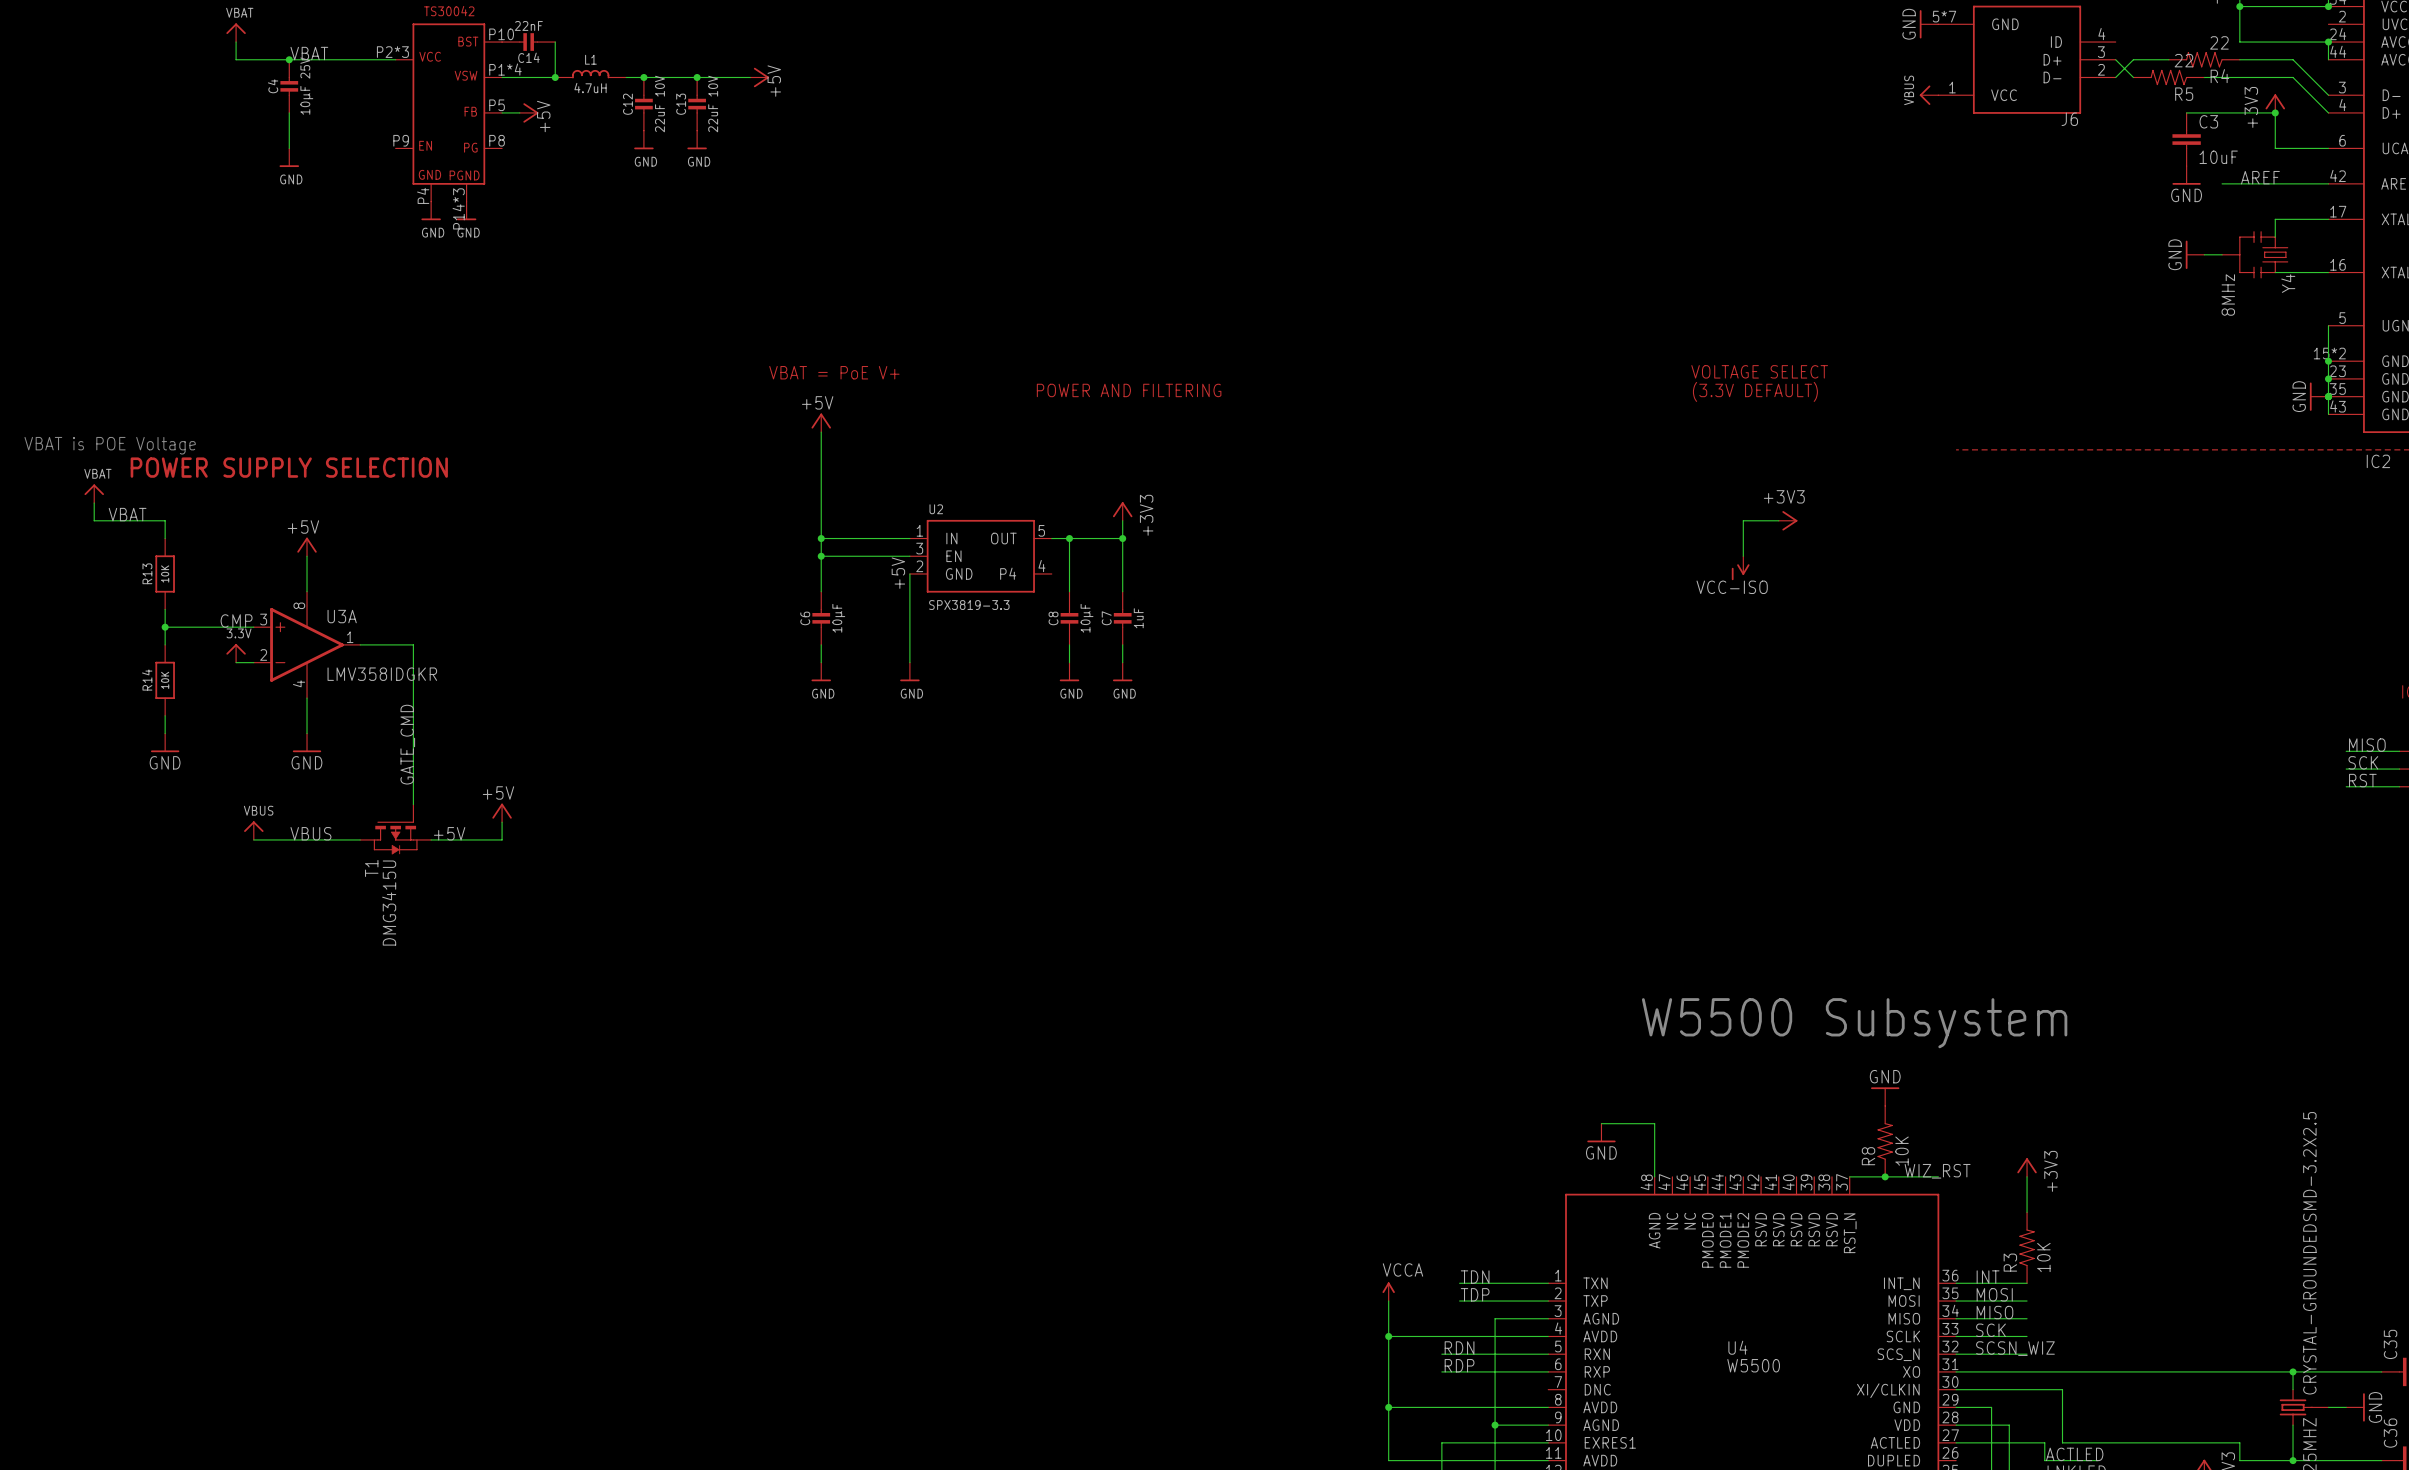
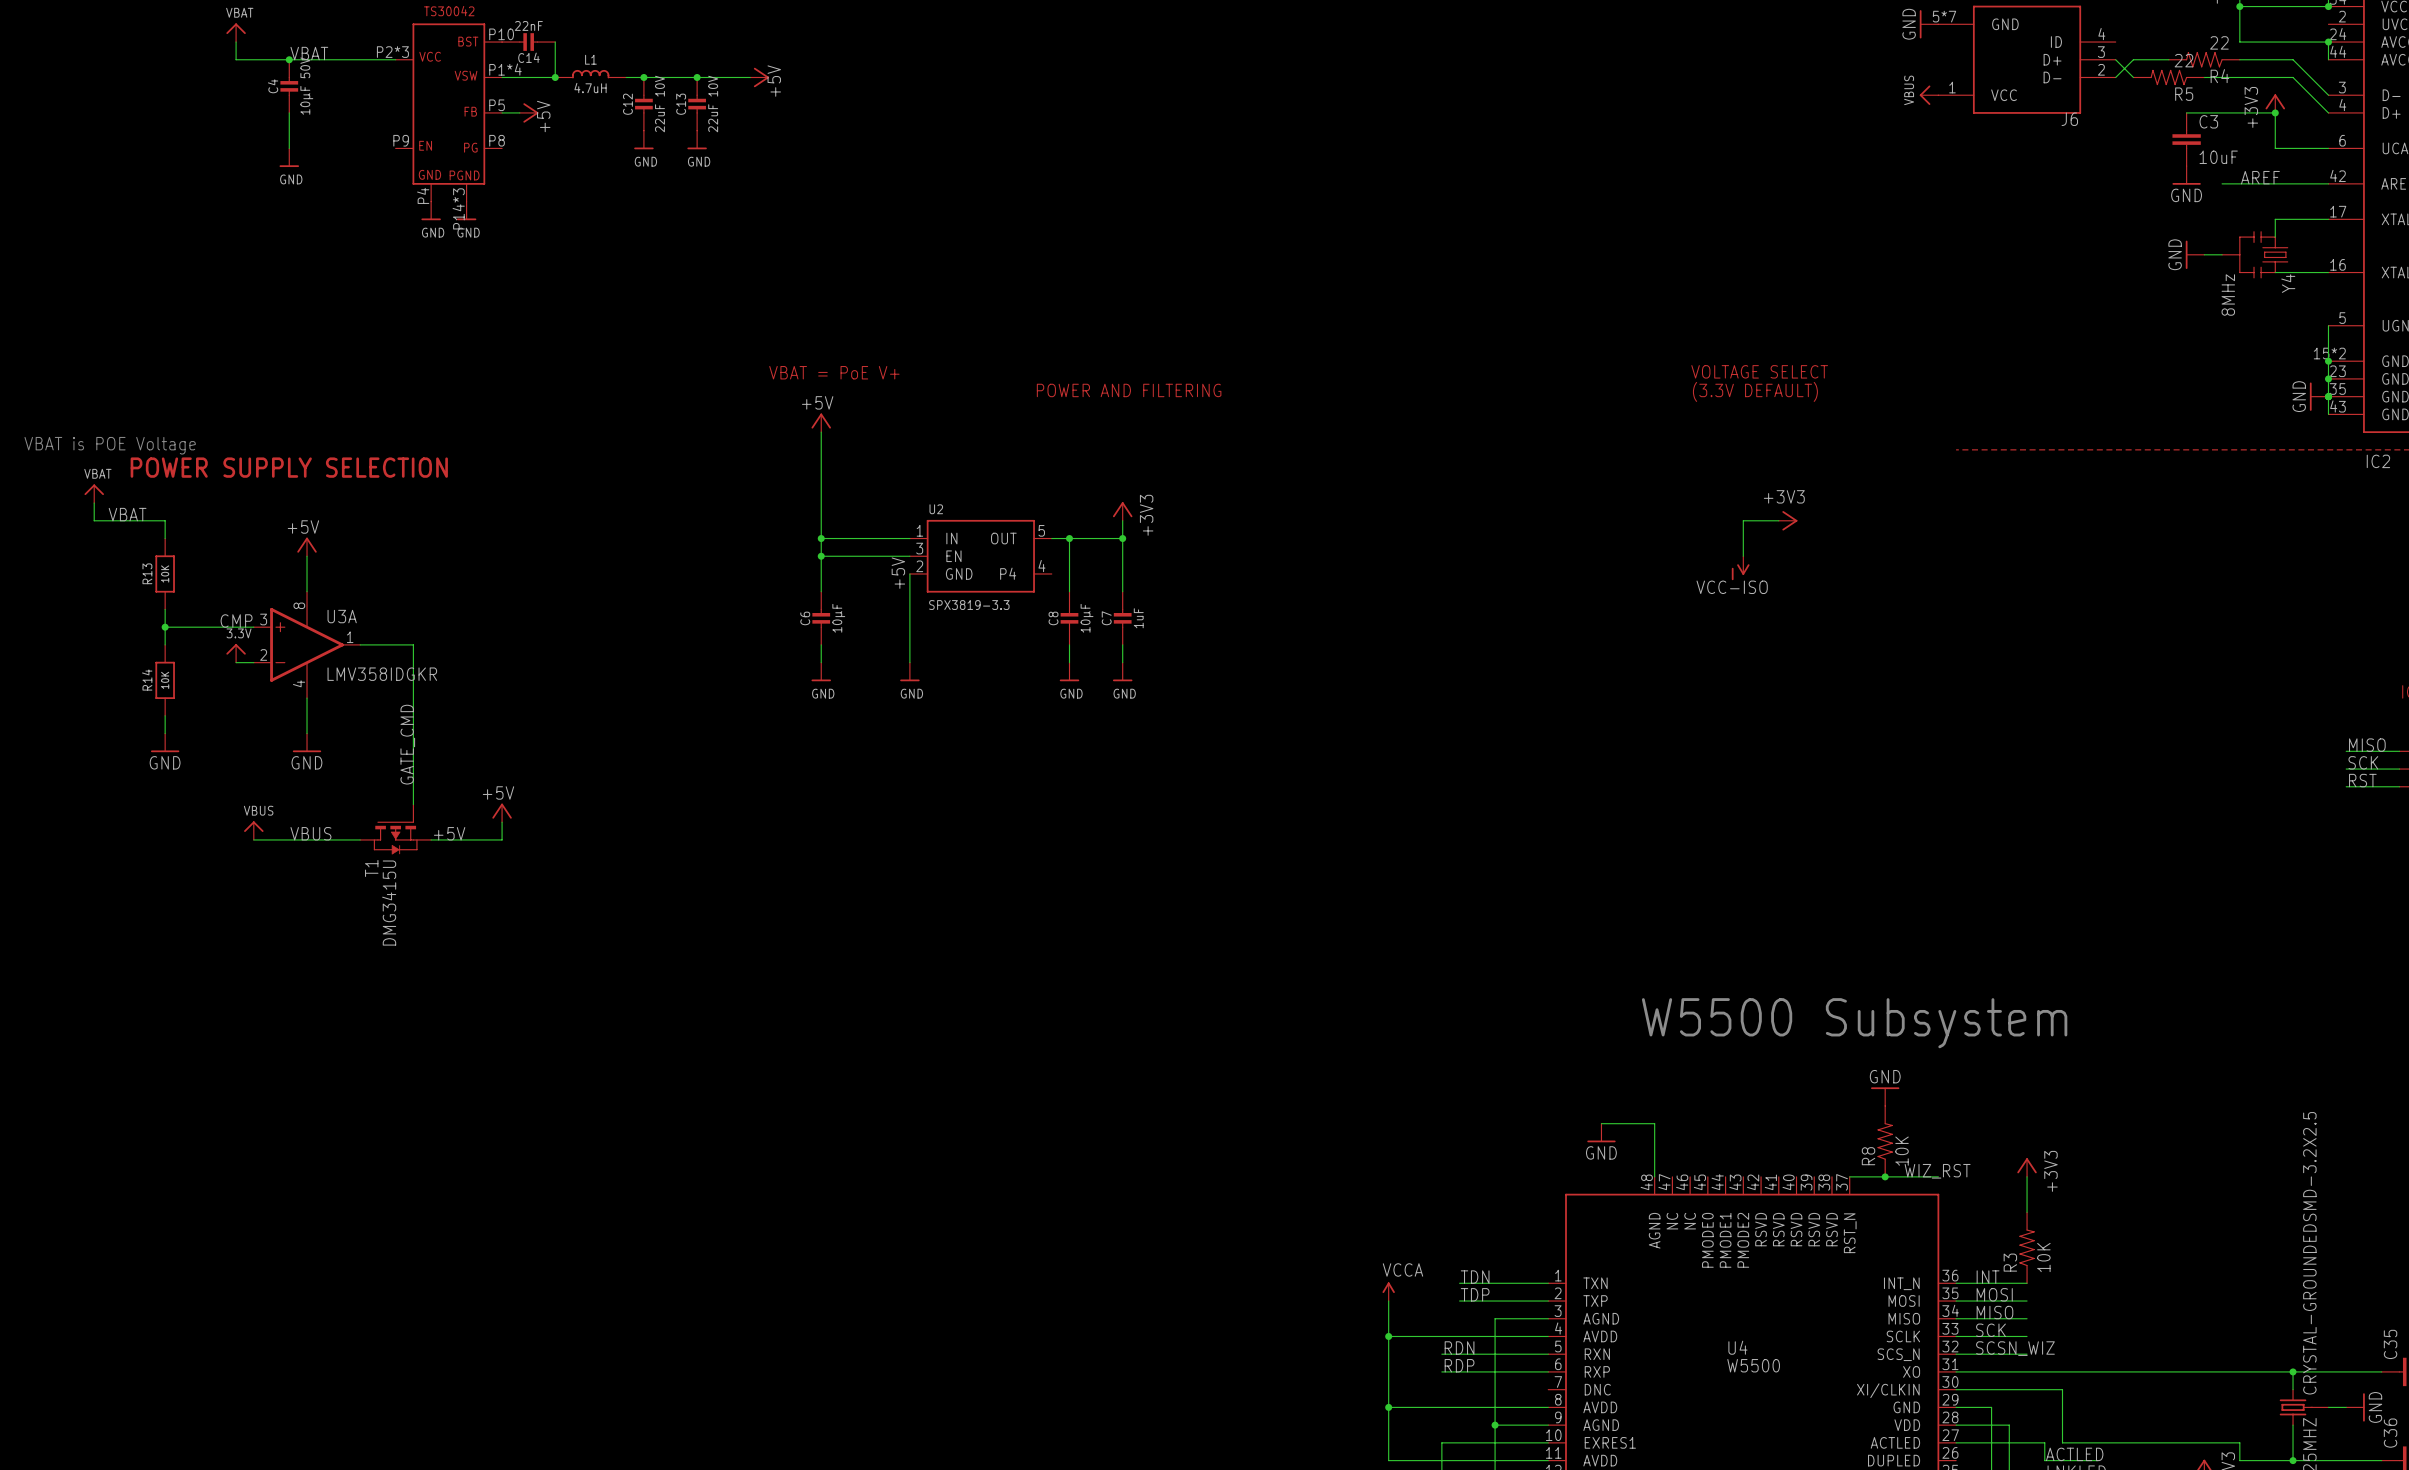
C4 value: 10µF 25V (306, 86) -> 10µF 50V (306, 86)

